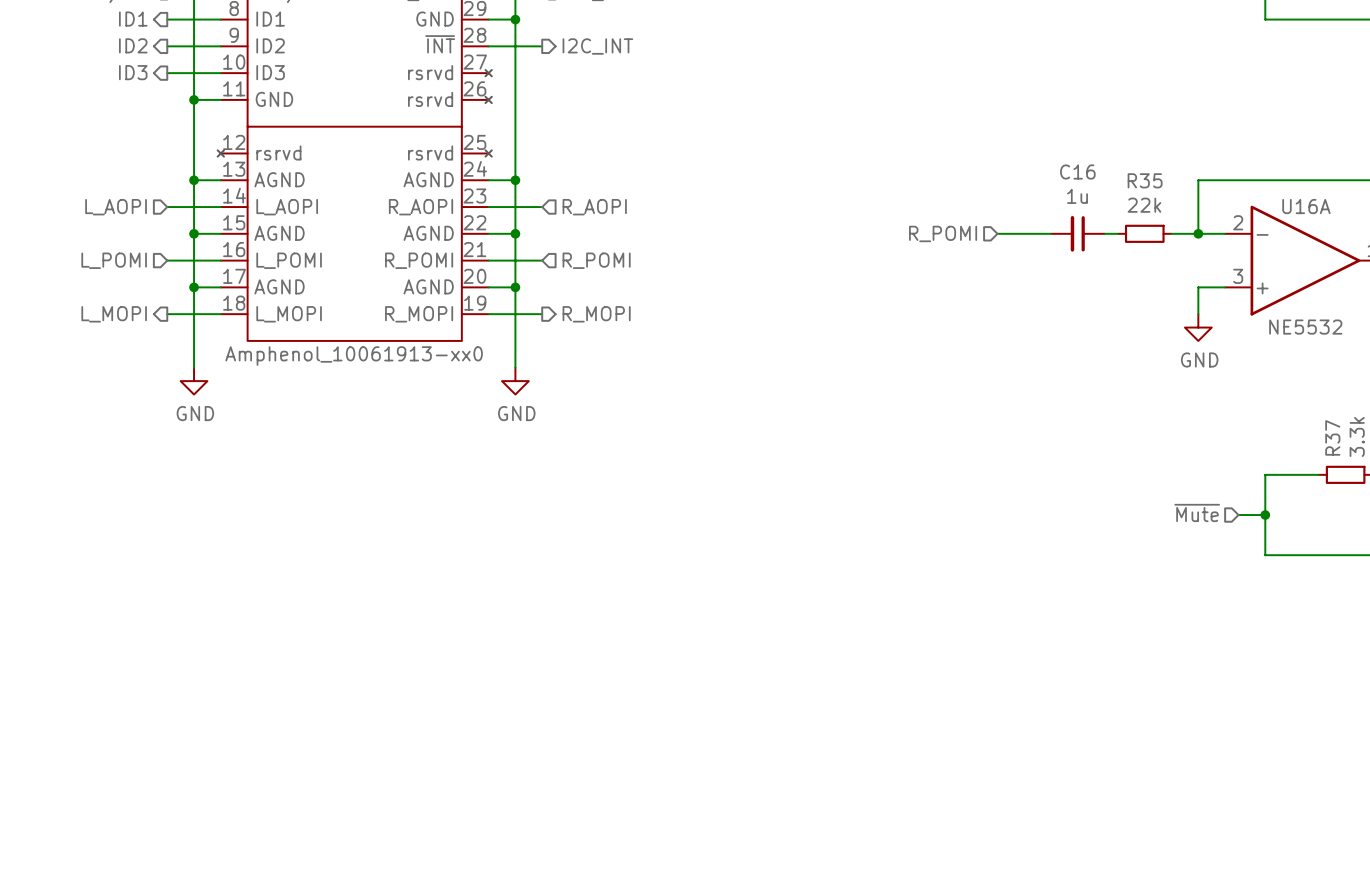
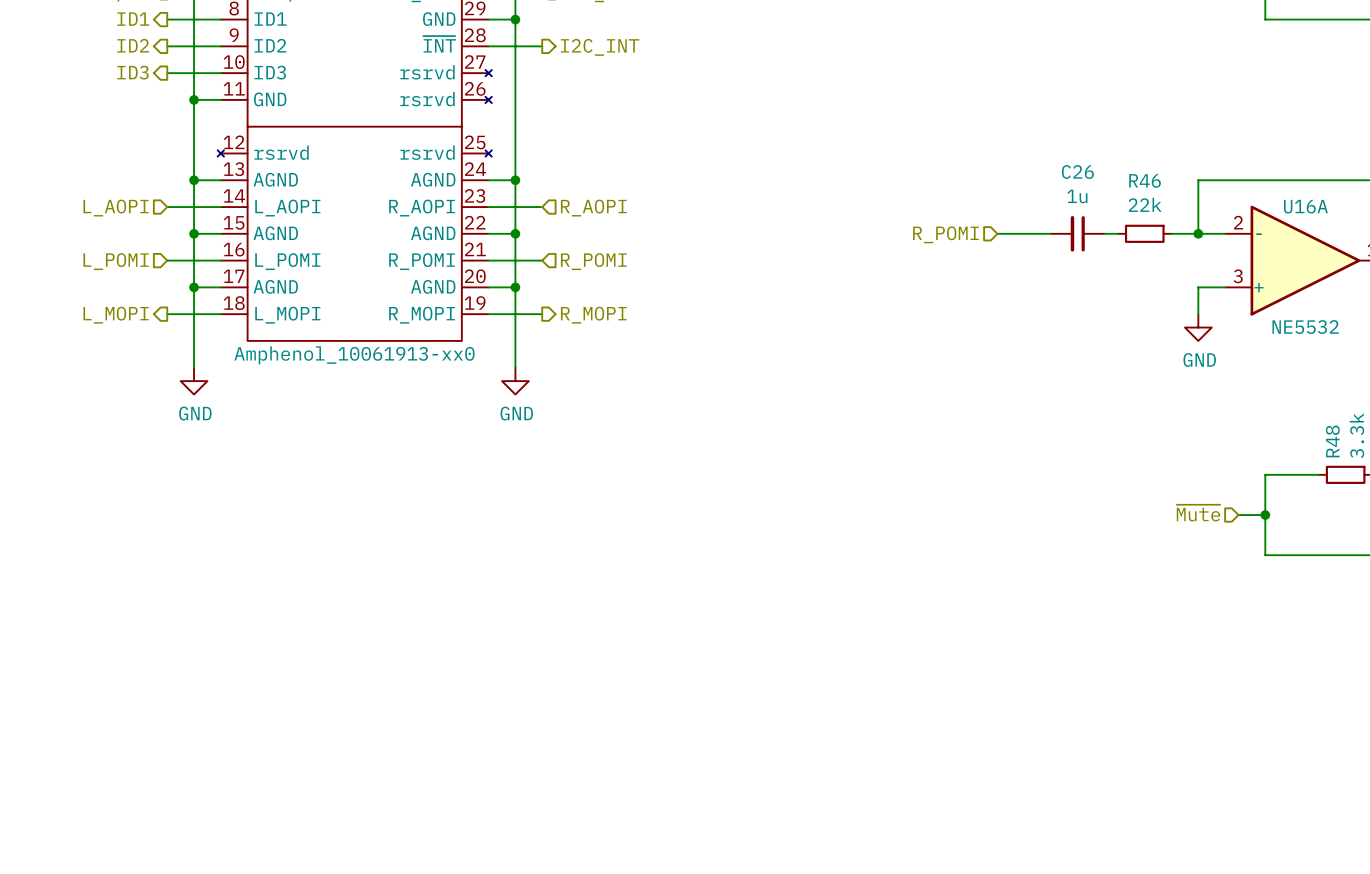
C16 name: C16 (1077, 171) -> C26 (1077, 171)
R35 name: R35 (1145, 180) -> R46 (1145, 180)
R37 name: R37 (1332, 437) -> R48 (1332, 441)

